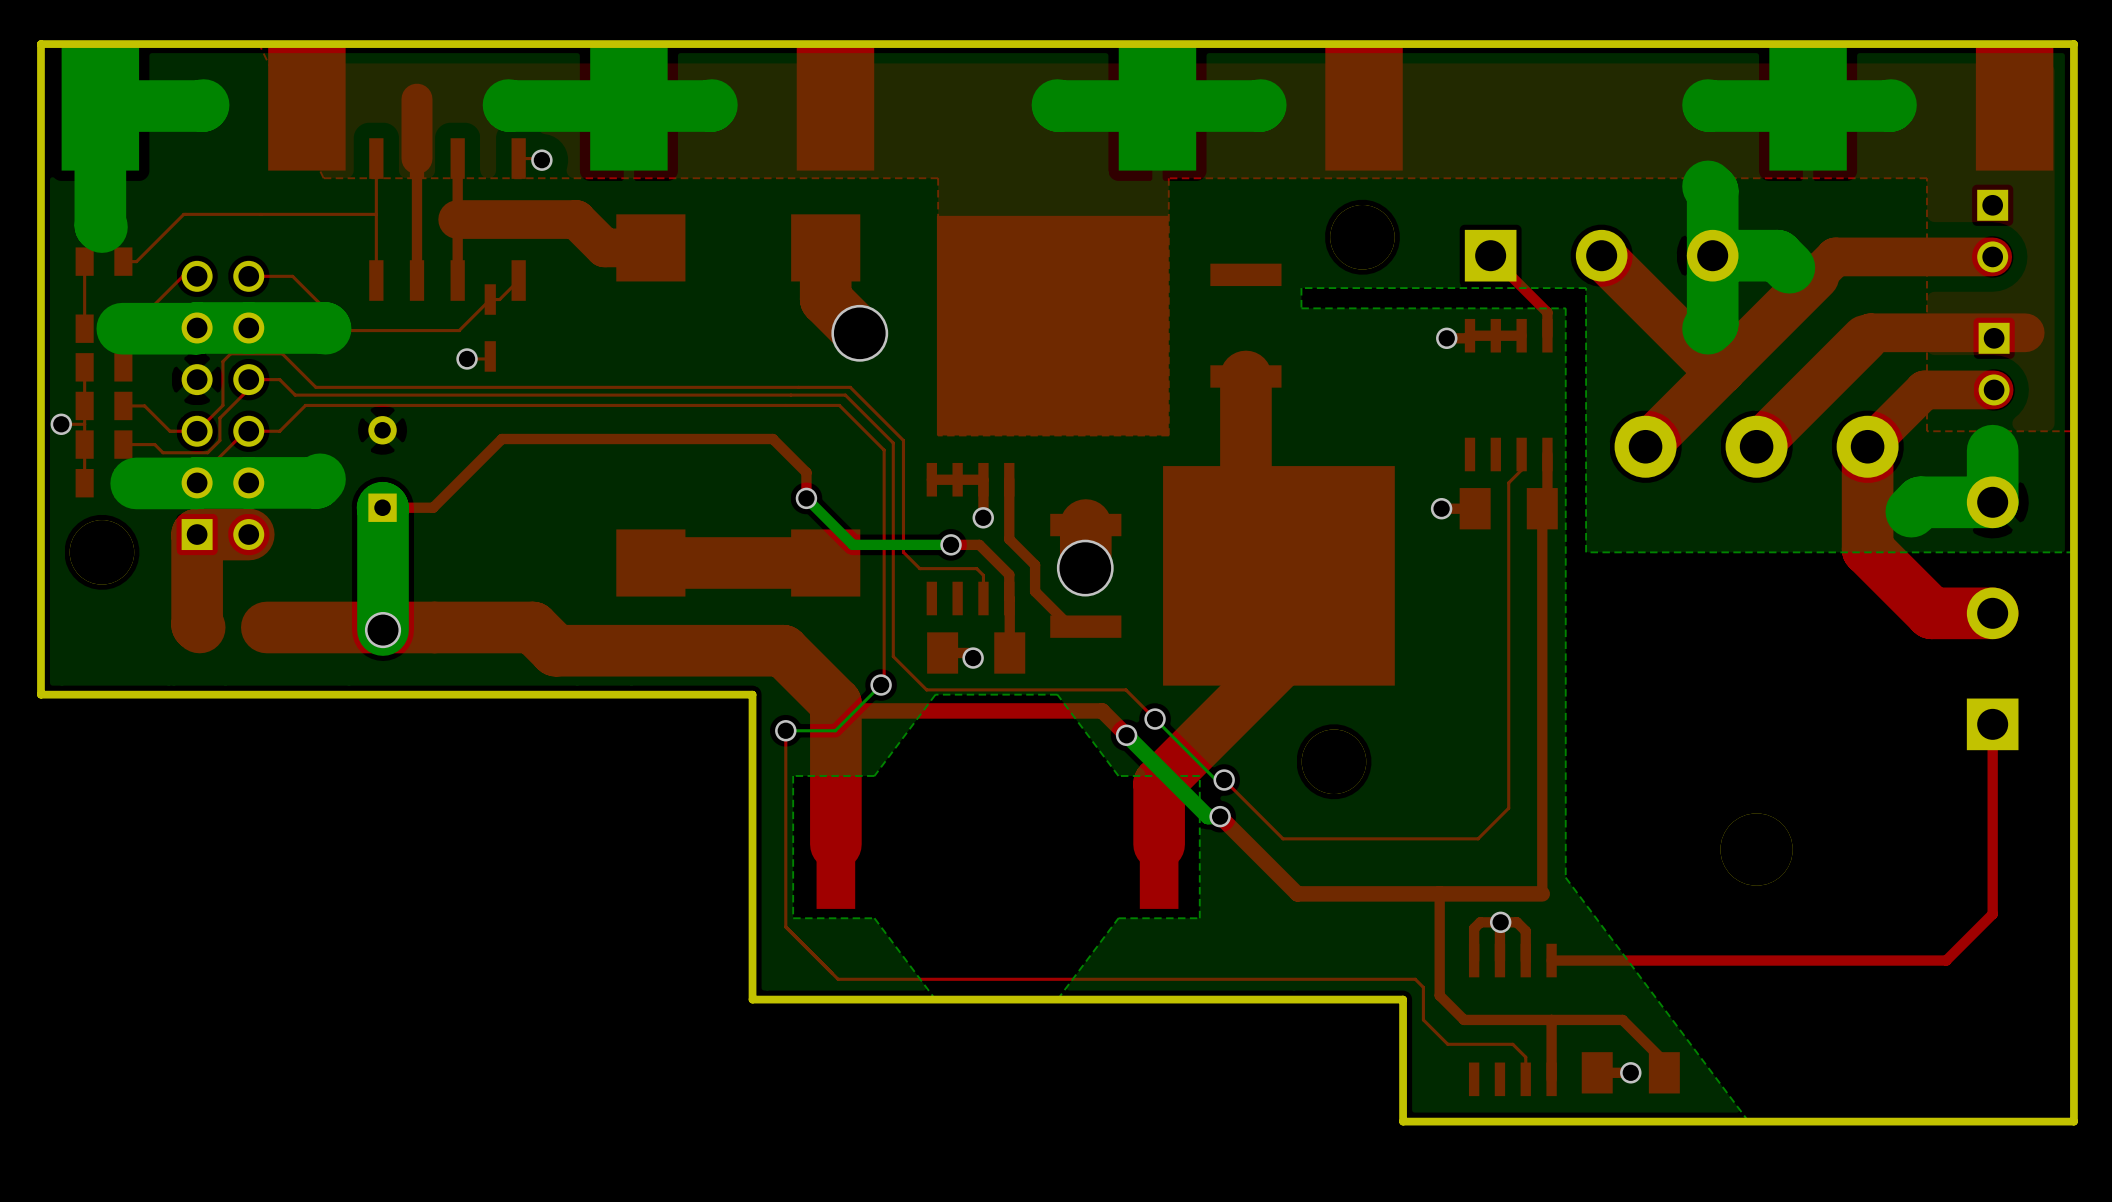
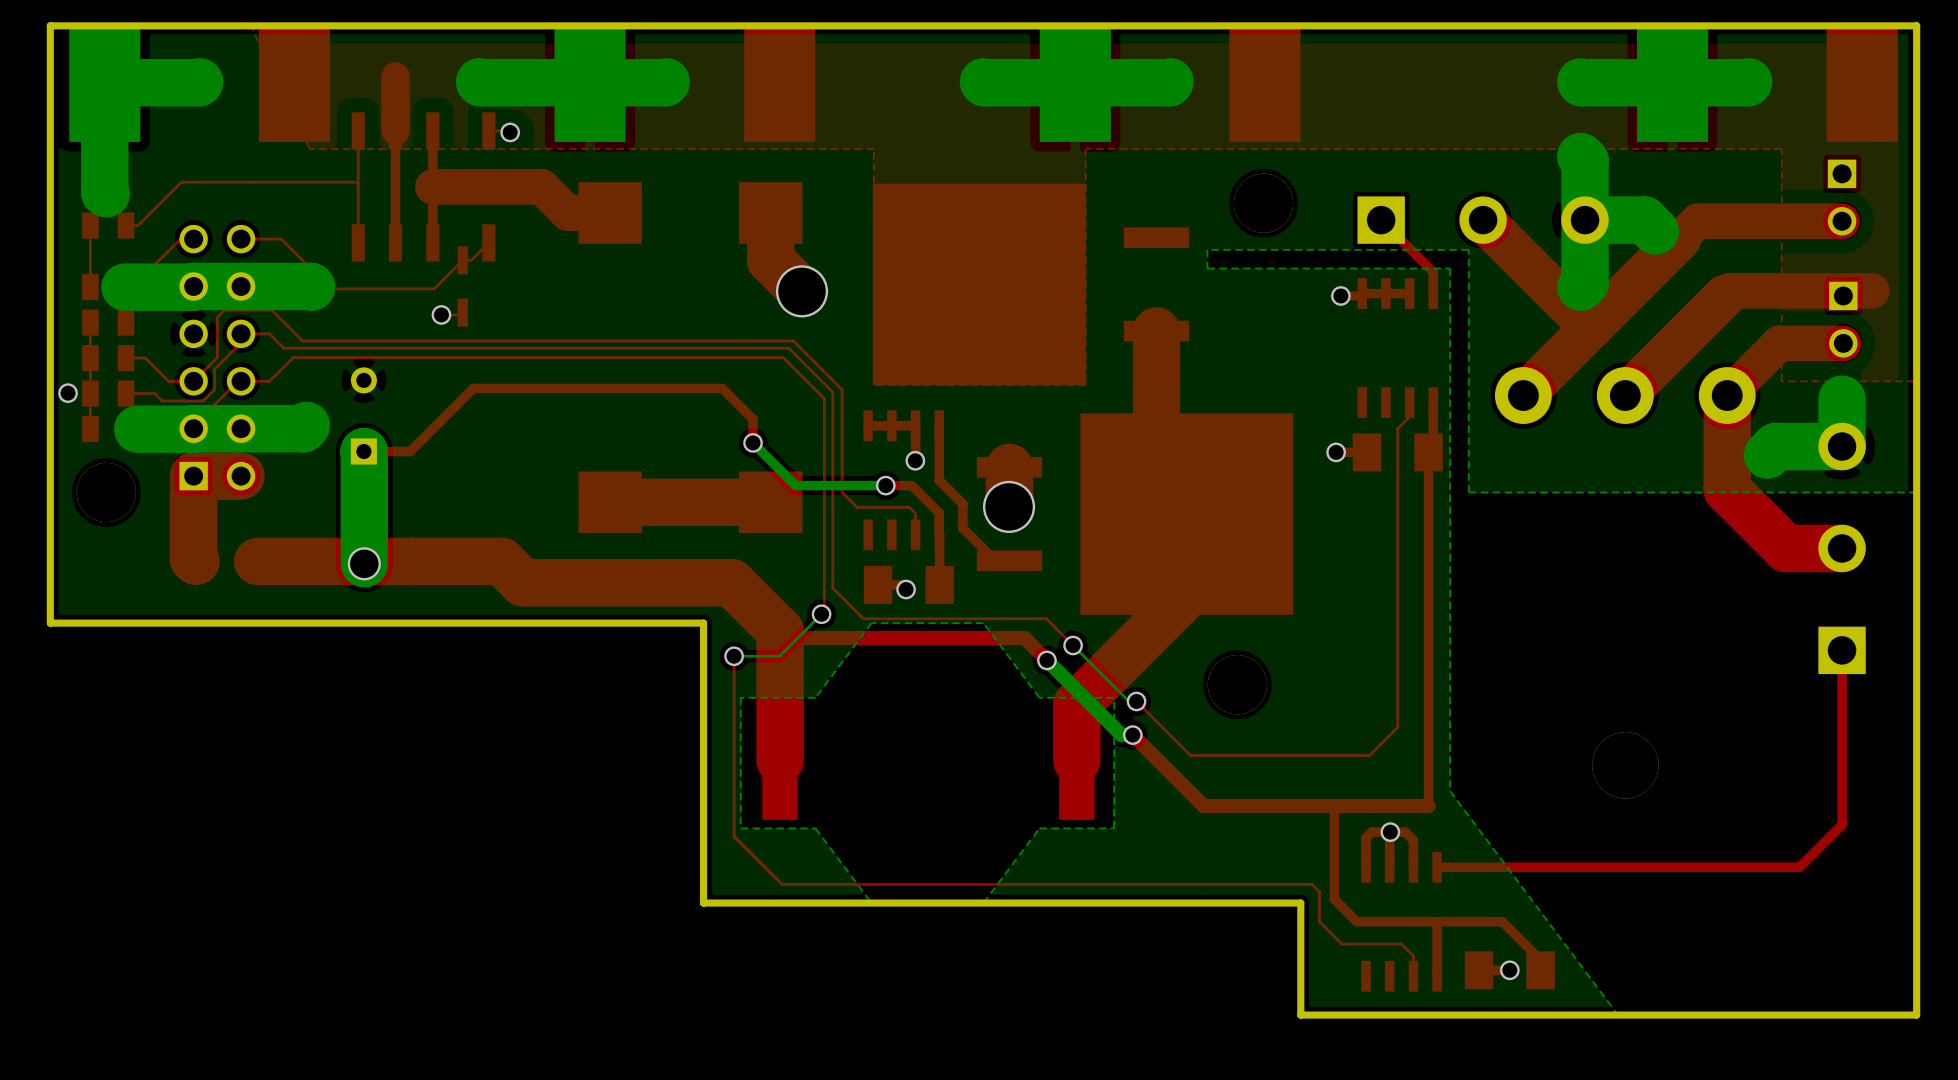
via position: (61, 424) -> (68, 393)
top track: (84, 424) (61, 424) -> none

